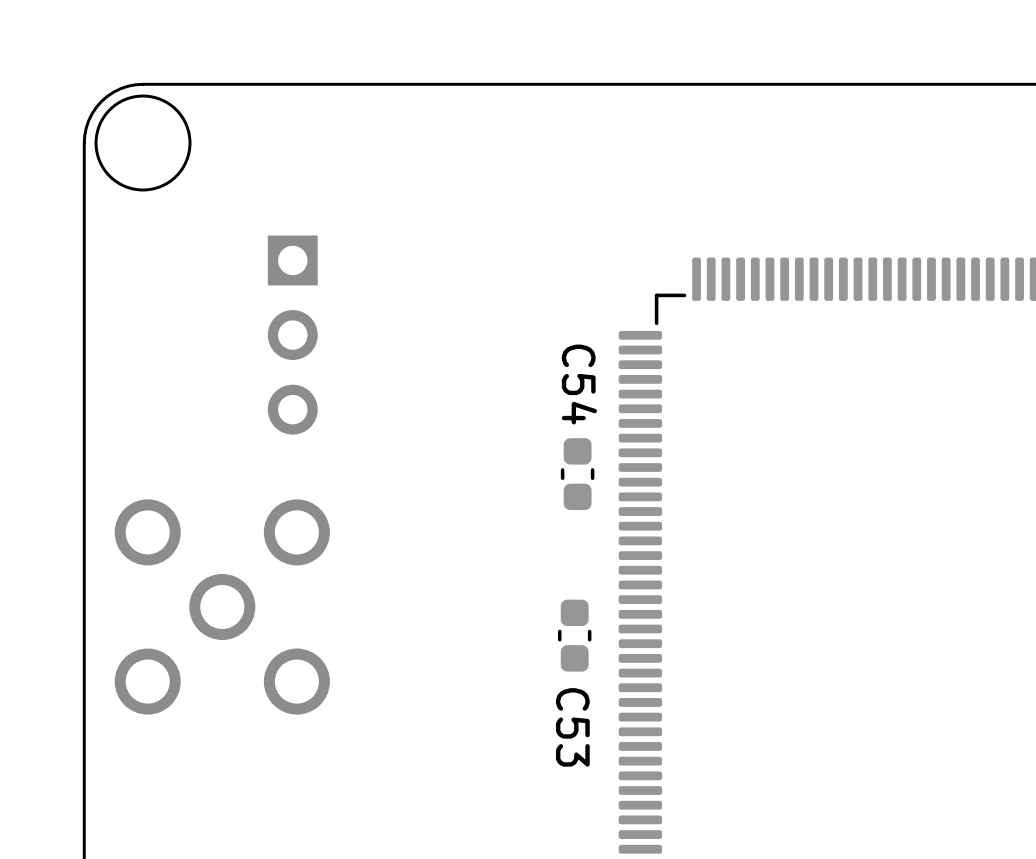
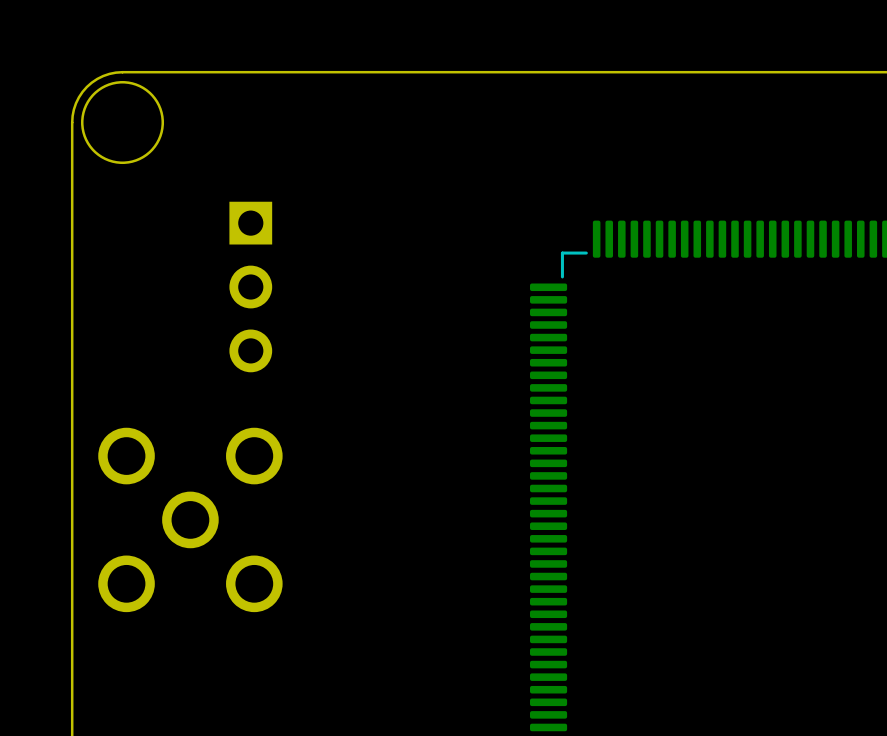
C54: (577, 474) -> none
C53: (574, 635) -> none

